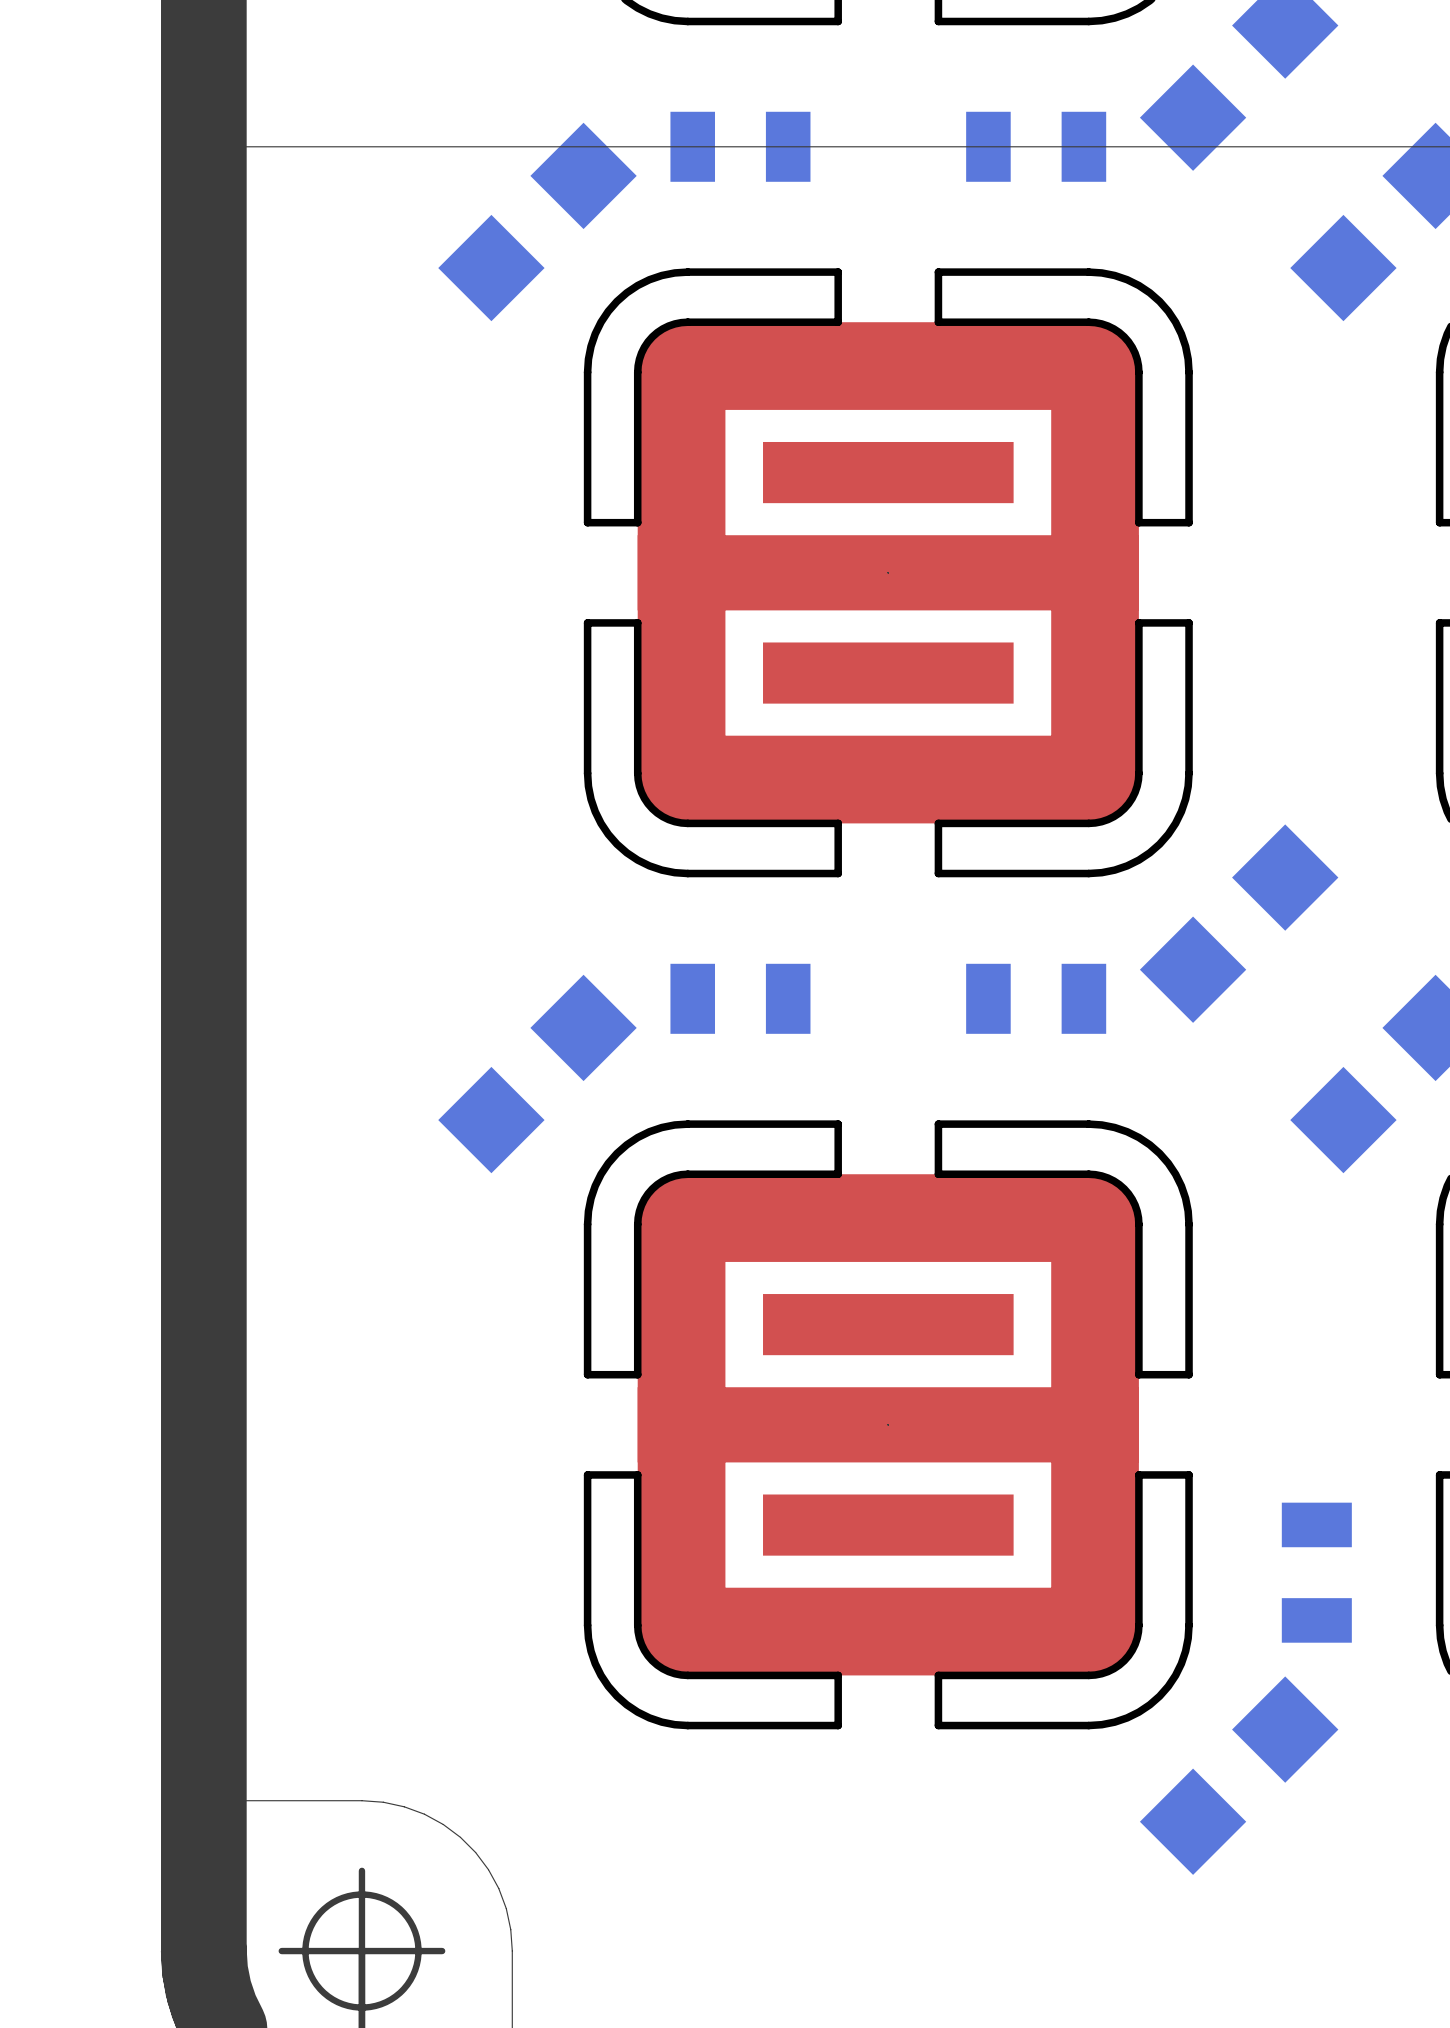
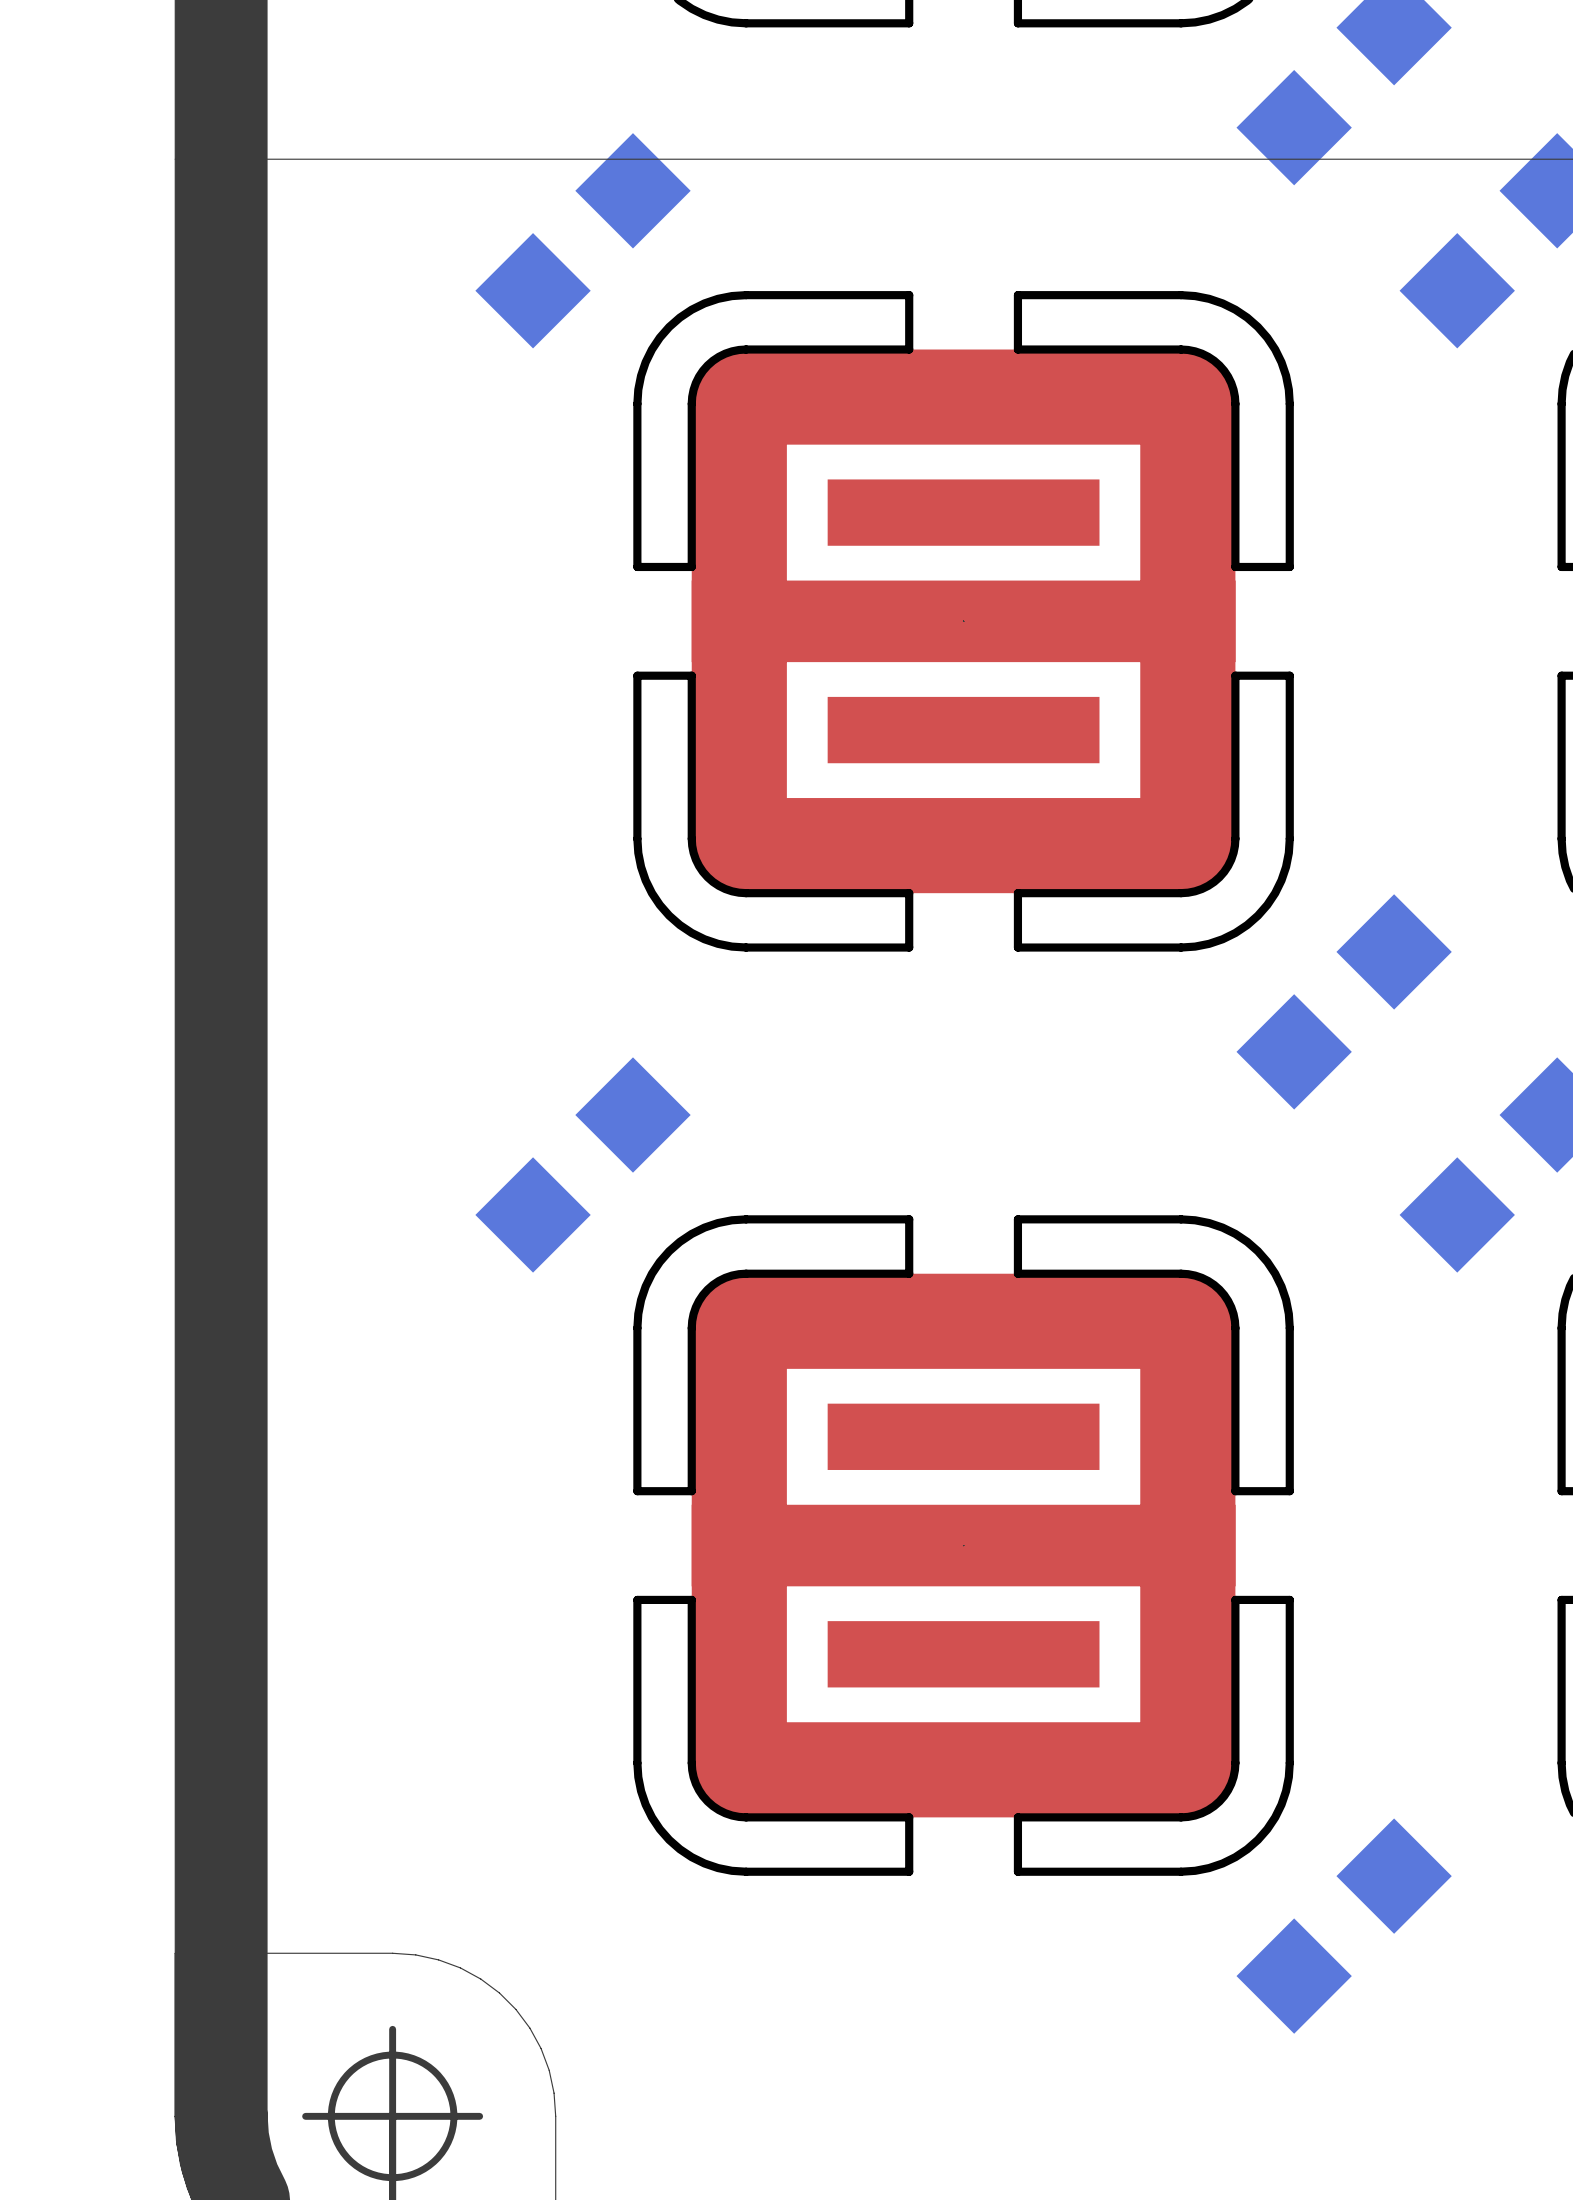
part: (740, 146) -> none
part: (1036, 146) -> none
part: (740, 998) -> none
part: (1036, 998) -> none
part: (1316, 1572) -> none

